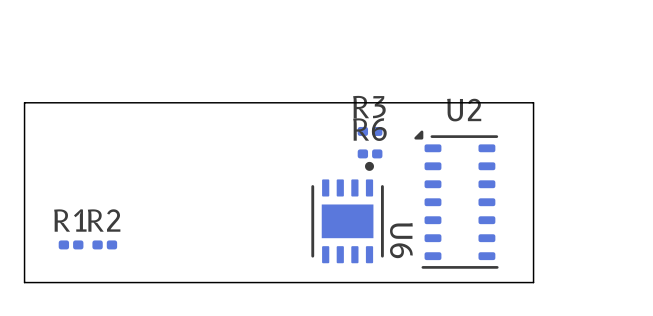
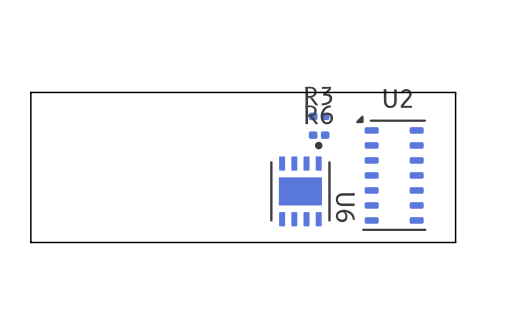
R1: (71, 244) -> none
R2: (104, 244) -> none

